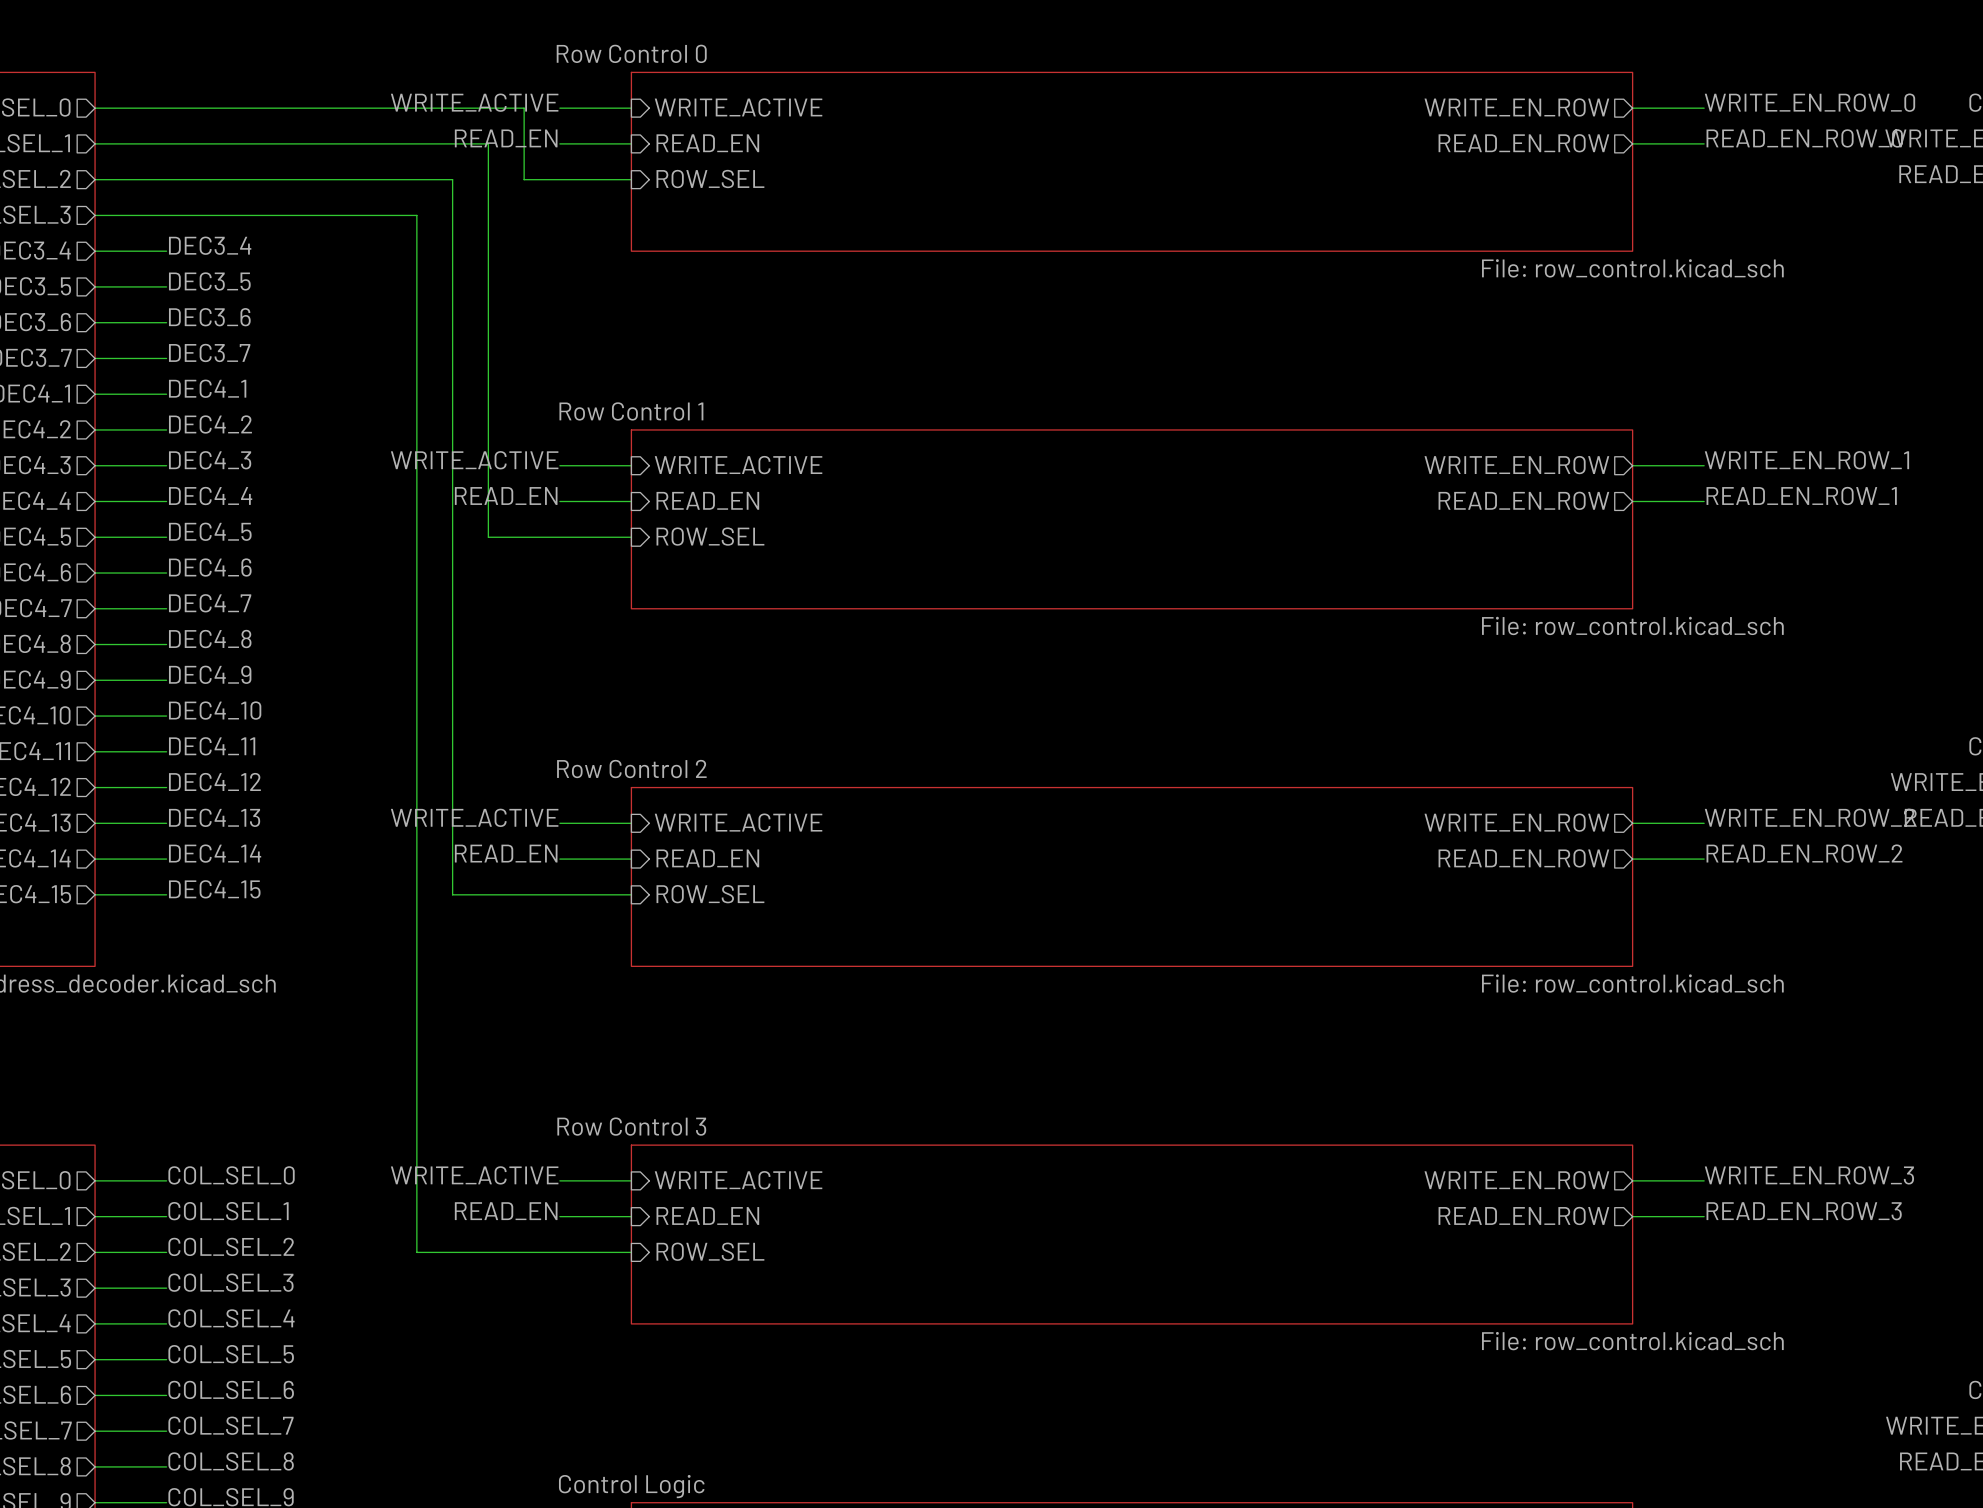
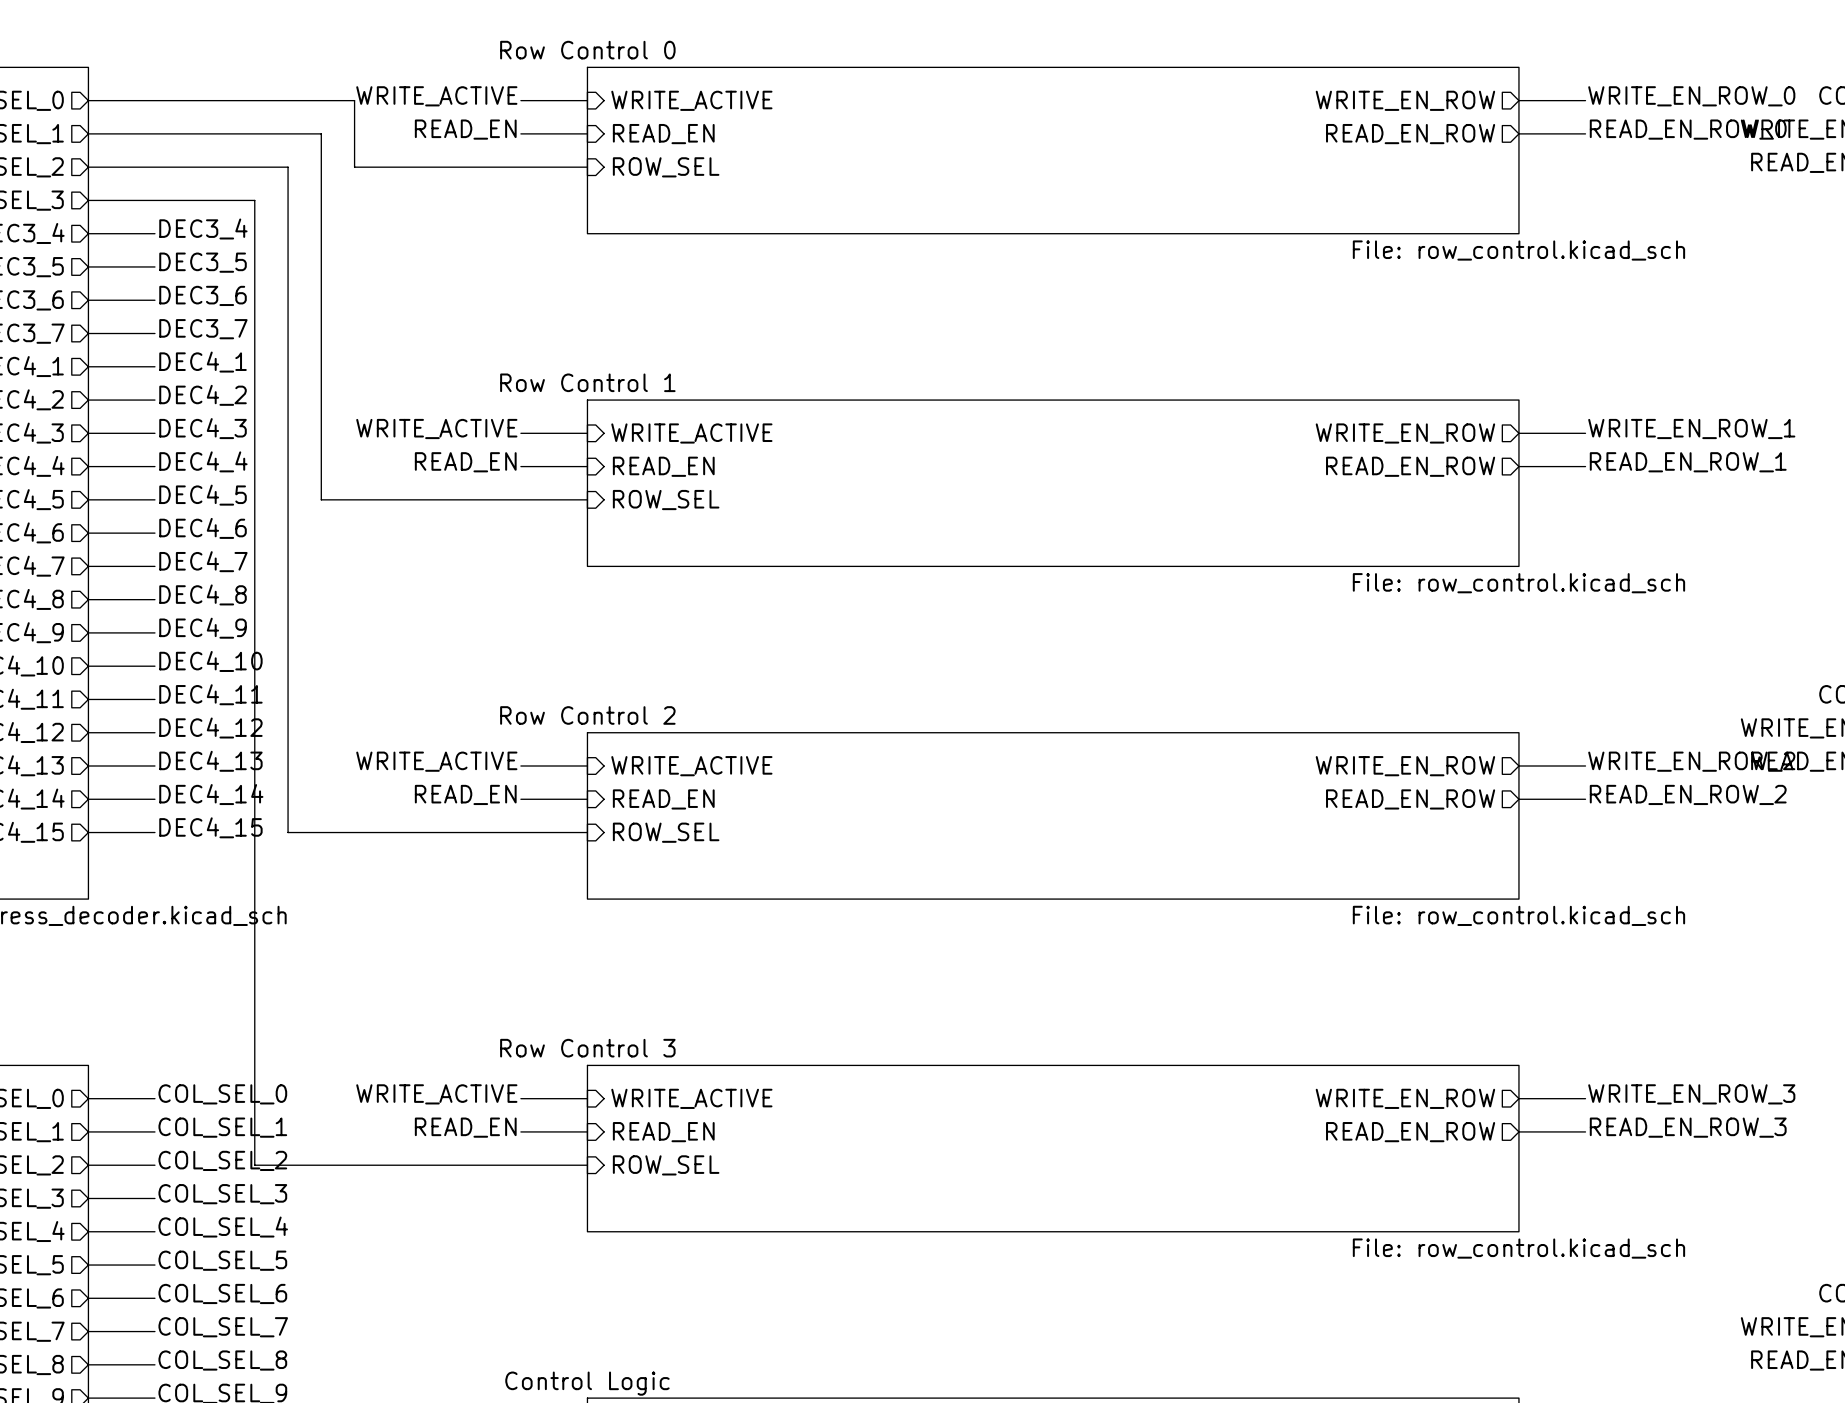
wire: (381, 108) (524, 108) (524, 179) -> (421, 167) (487, 167)
wire: (345, 143) (488, 143) (488, 537) -> (321, 133) (321, 499) (454, 499)
wire: (309, 179) (381, 179) -> (354, 100) (354, 167)
wire: (452, 179) (452, 894) -> (288, 167) (288, 832) (421, 832)
wire: (273, 215) (416, 215) (416, 1252) -> (254, 200) (254, 1165) (387, 1165)

